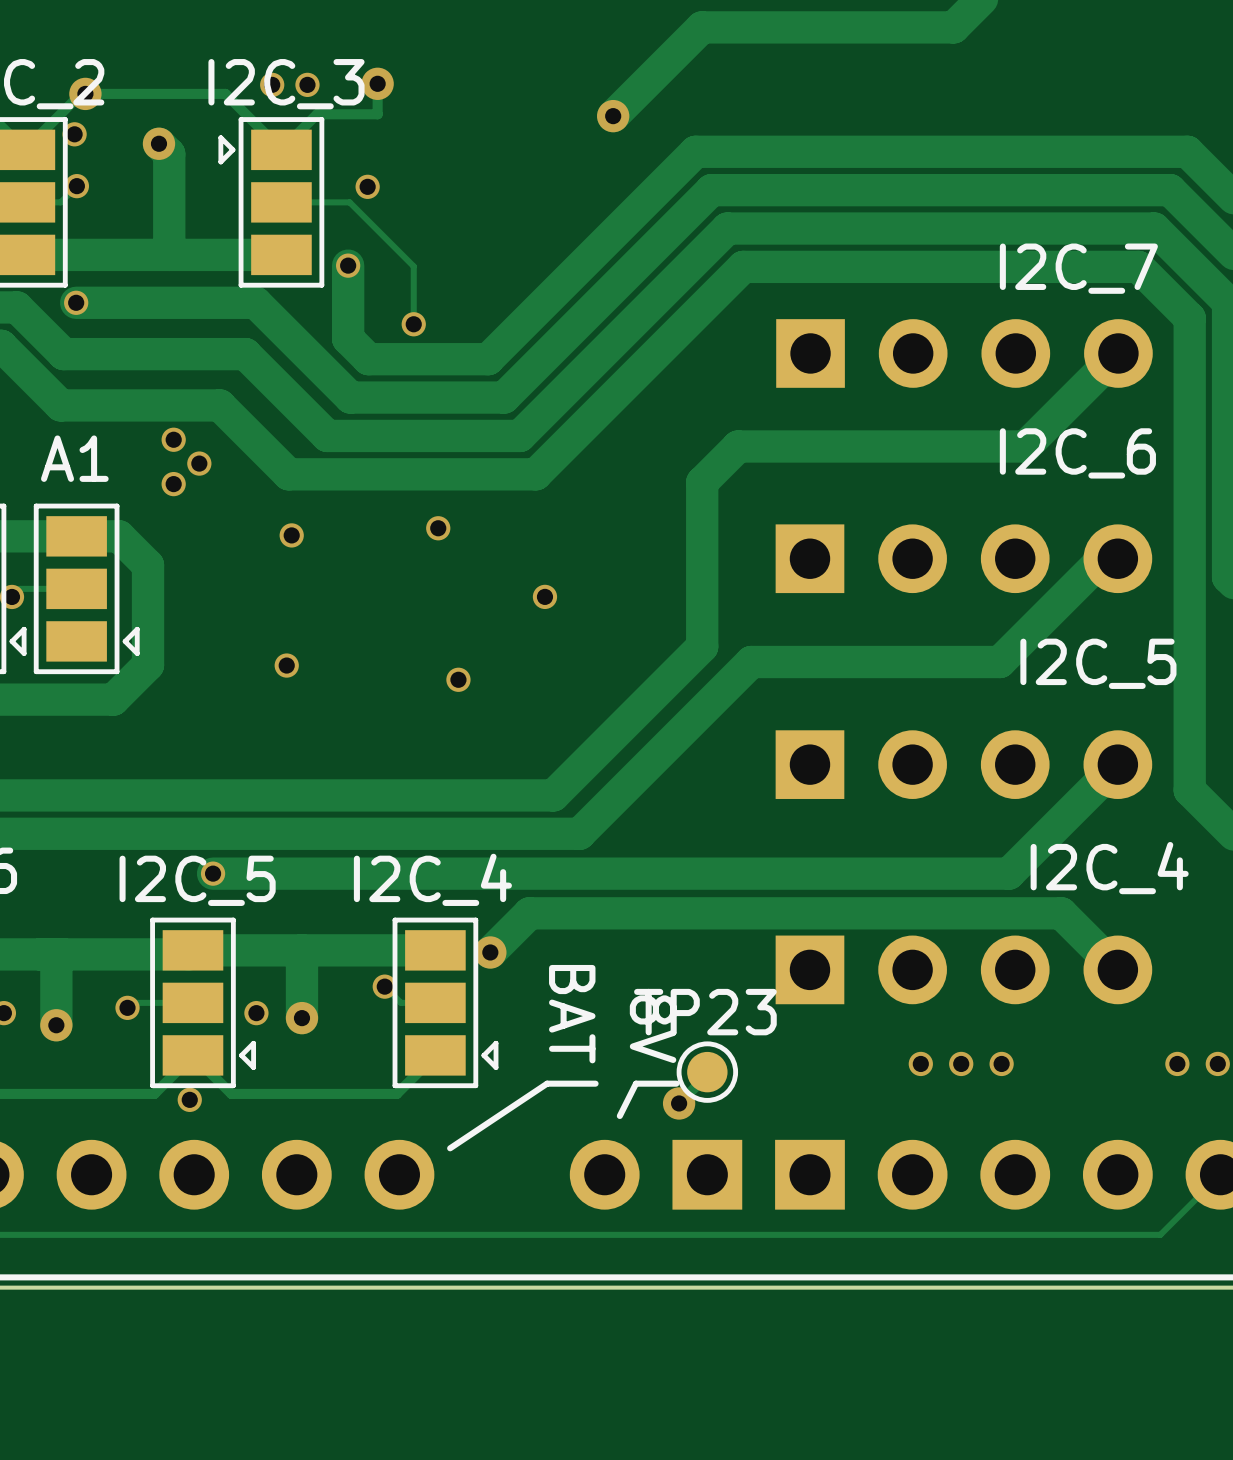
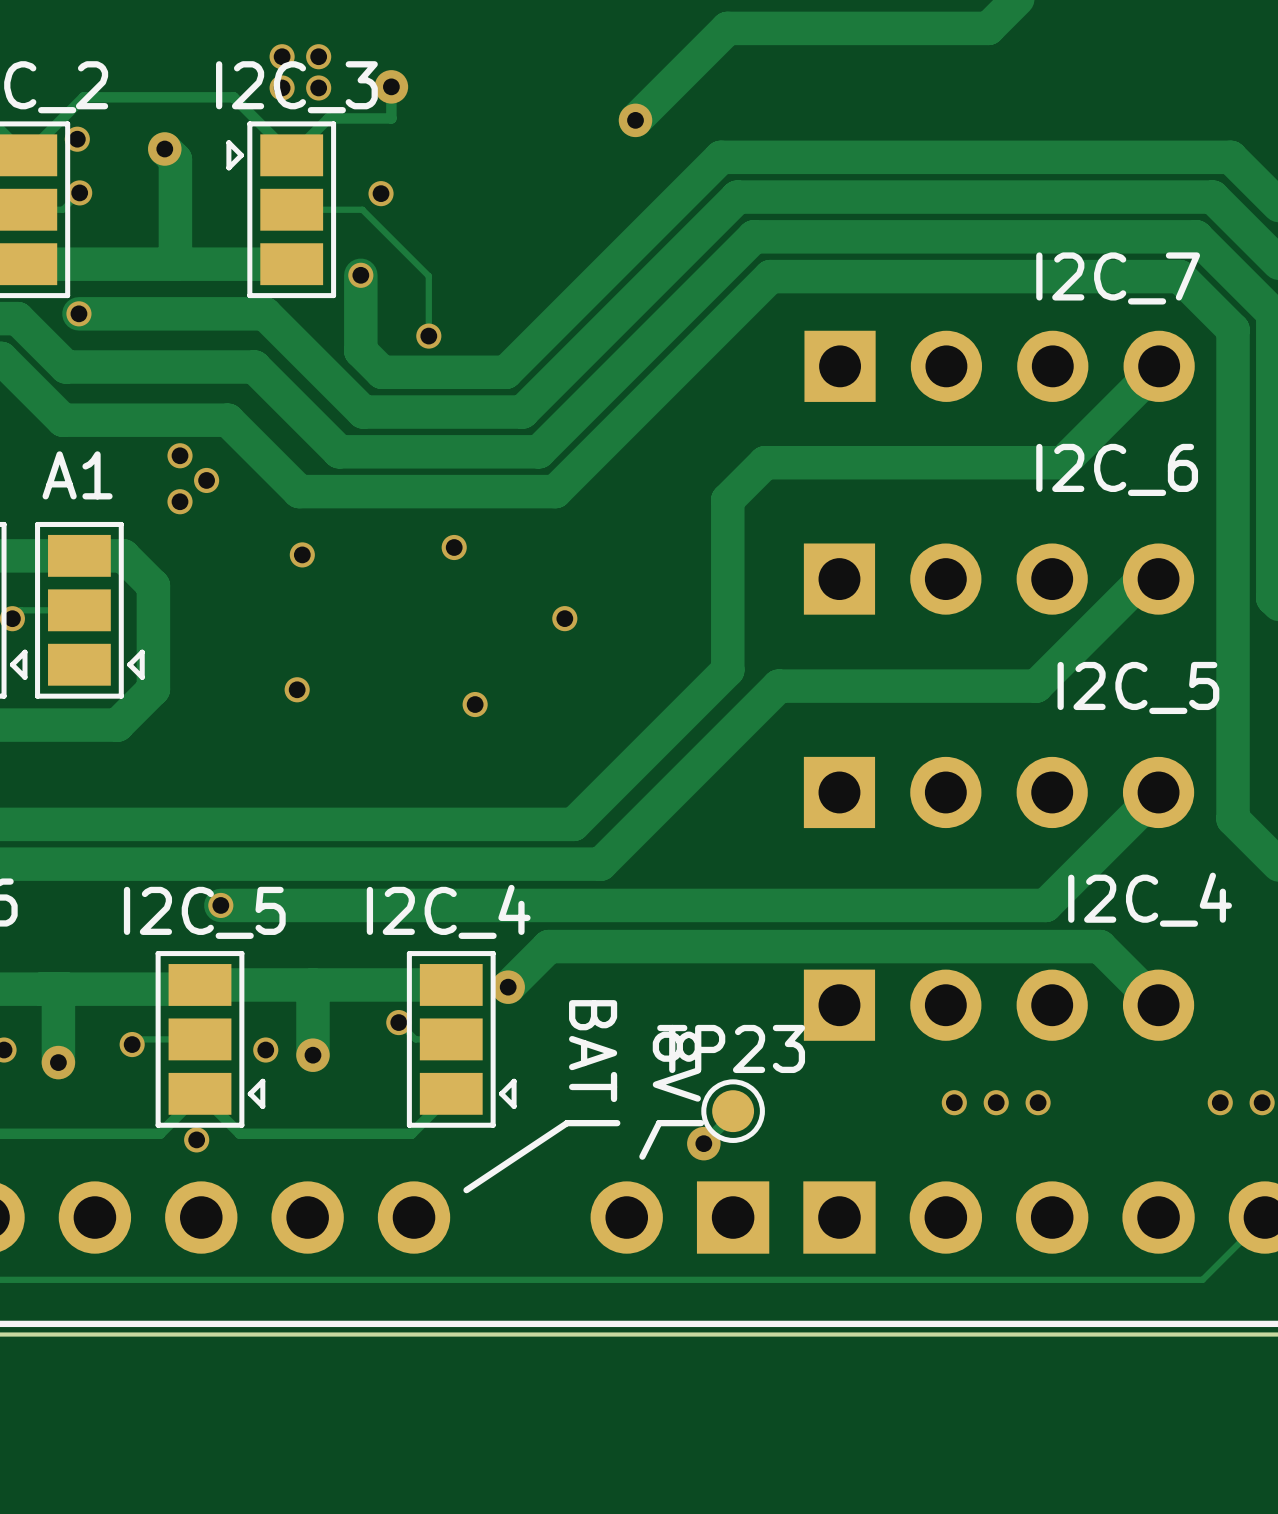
via: none -> (282, 56)
via: none -> (318, 56)
via: (85, 93) -> none

